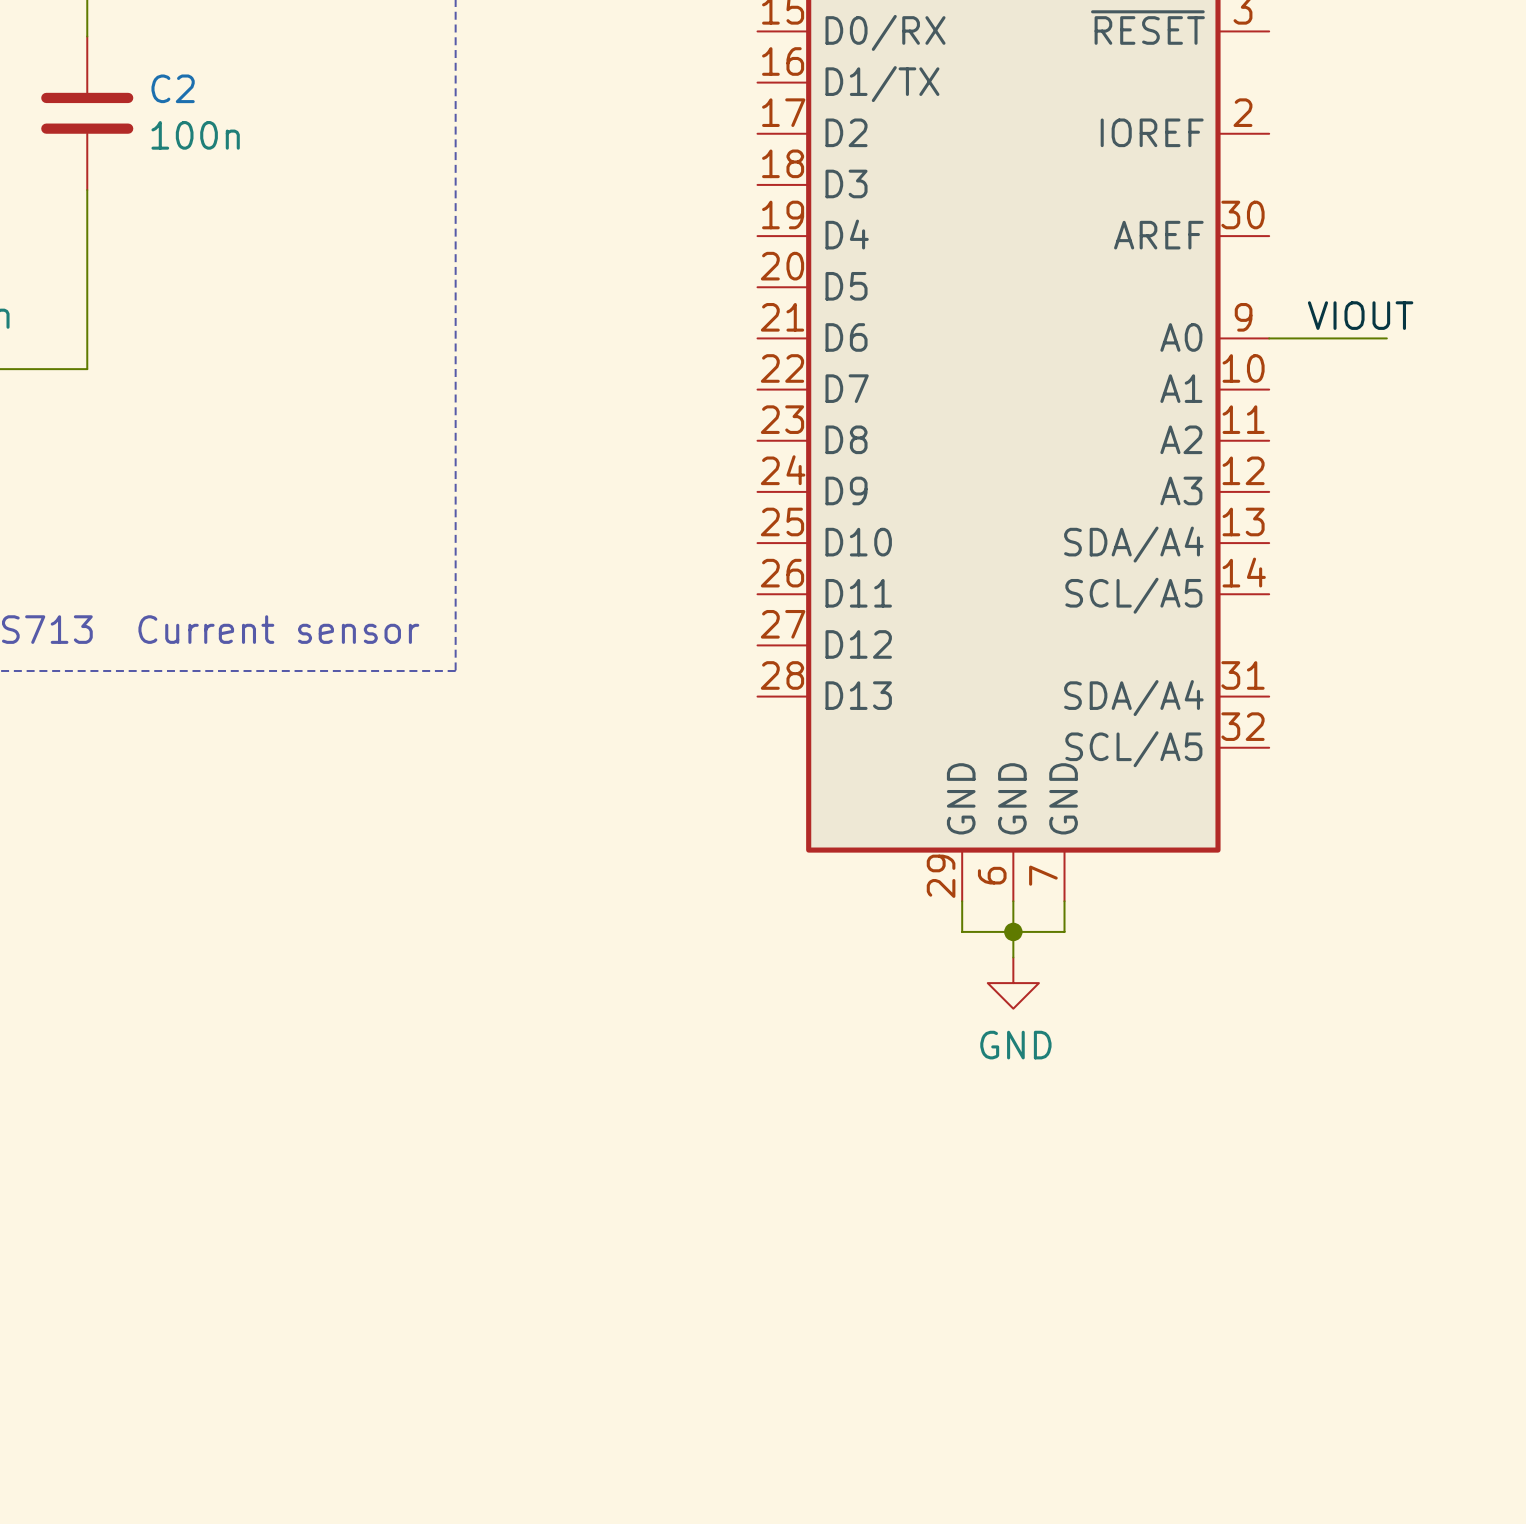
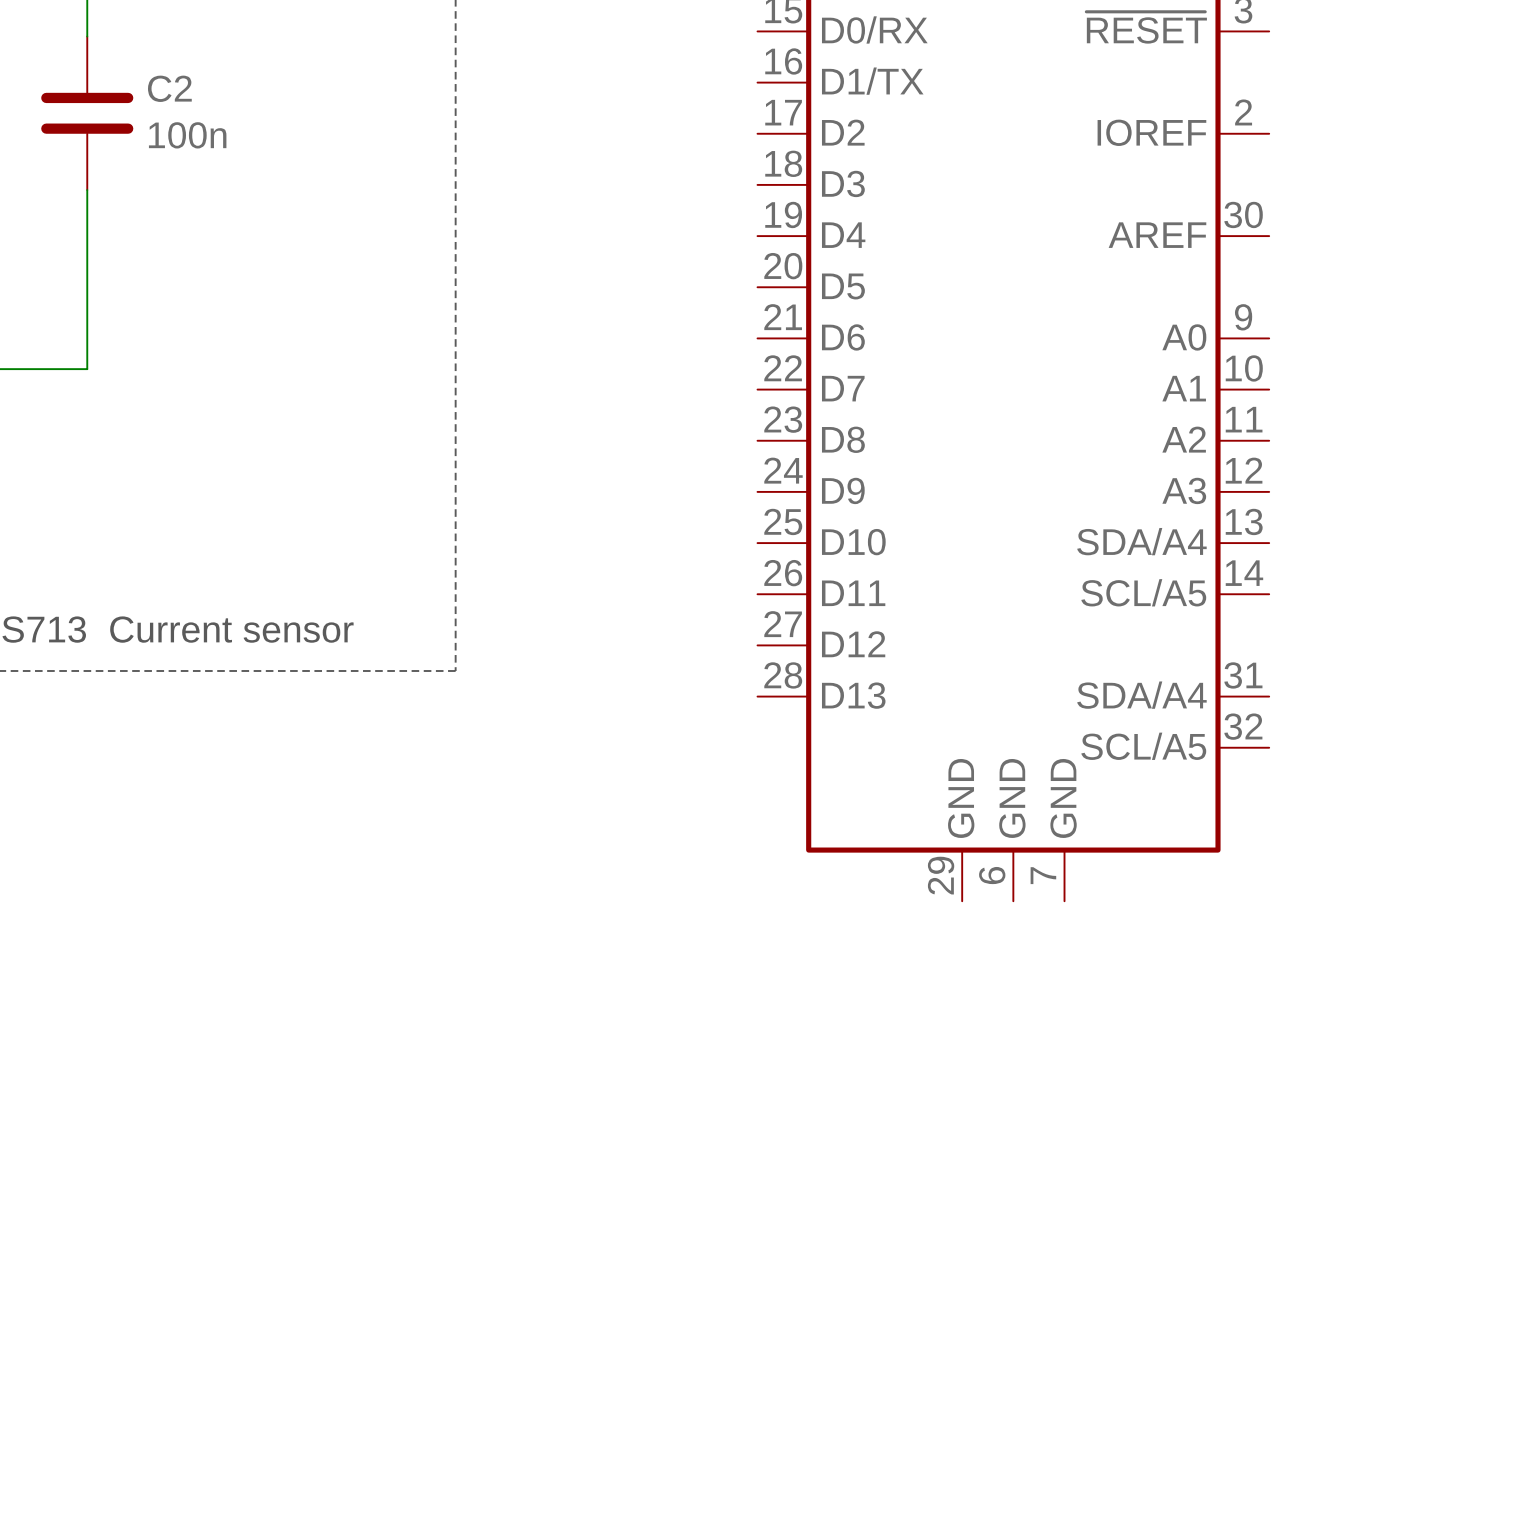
label: VIOUT (1360, 315) -> none
wire: (1269, 338) (1386, 338) -> none
wire: (962, 901) (962, 931) (1064, 931) (1064, 901) -> none
wire: (1013, 901) (1013, 957) -> none
junction: (1013, 931) -> none
power symbol: GND (1013, 983) -> none

